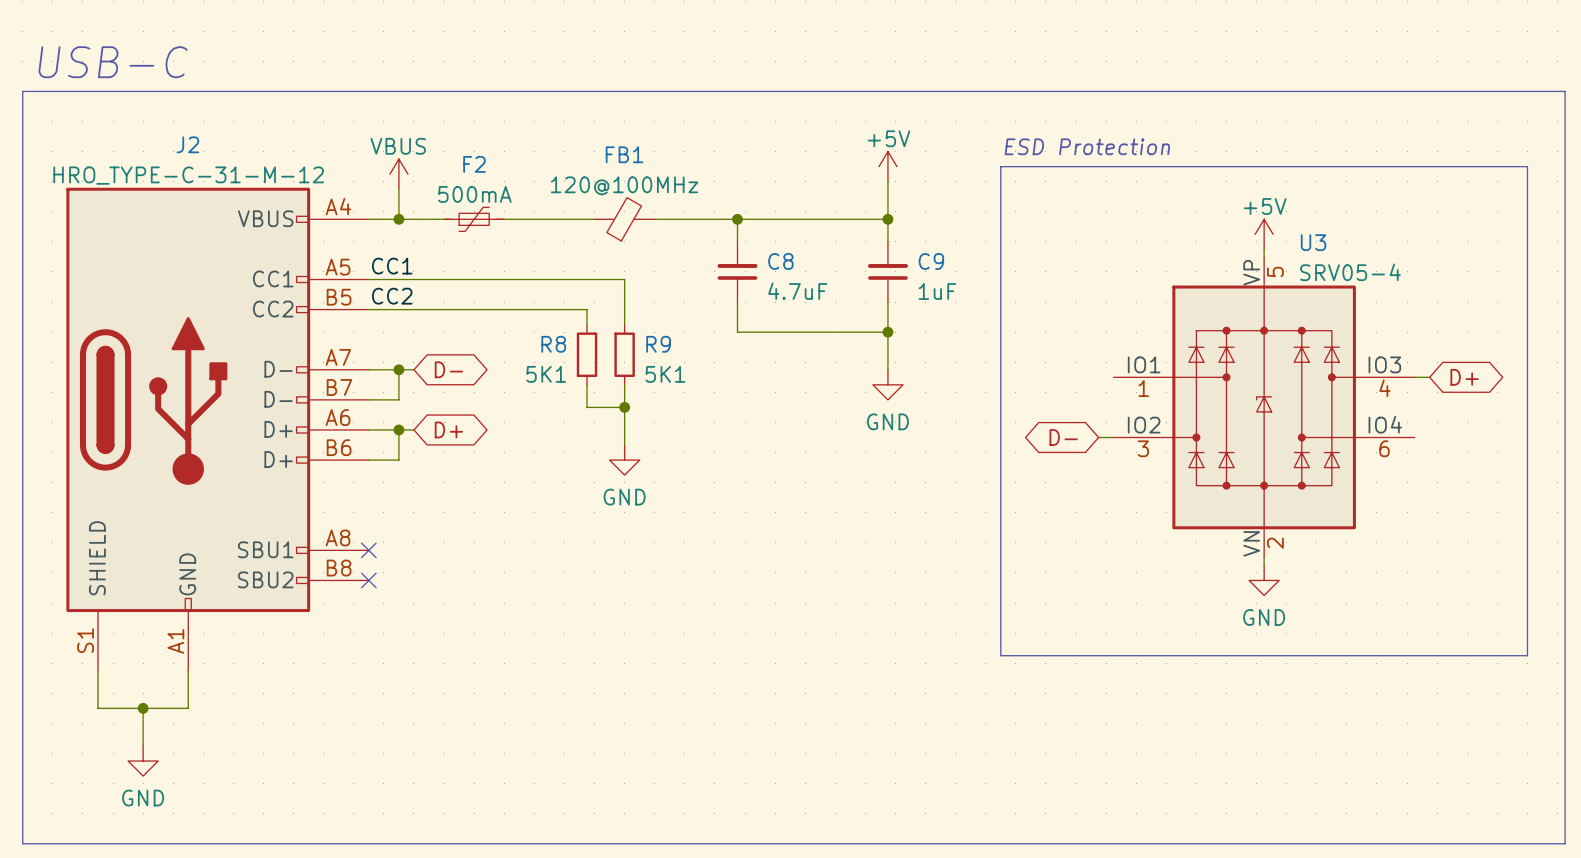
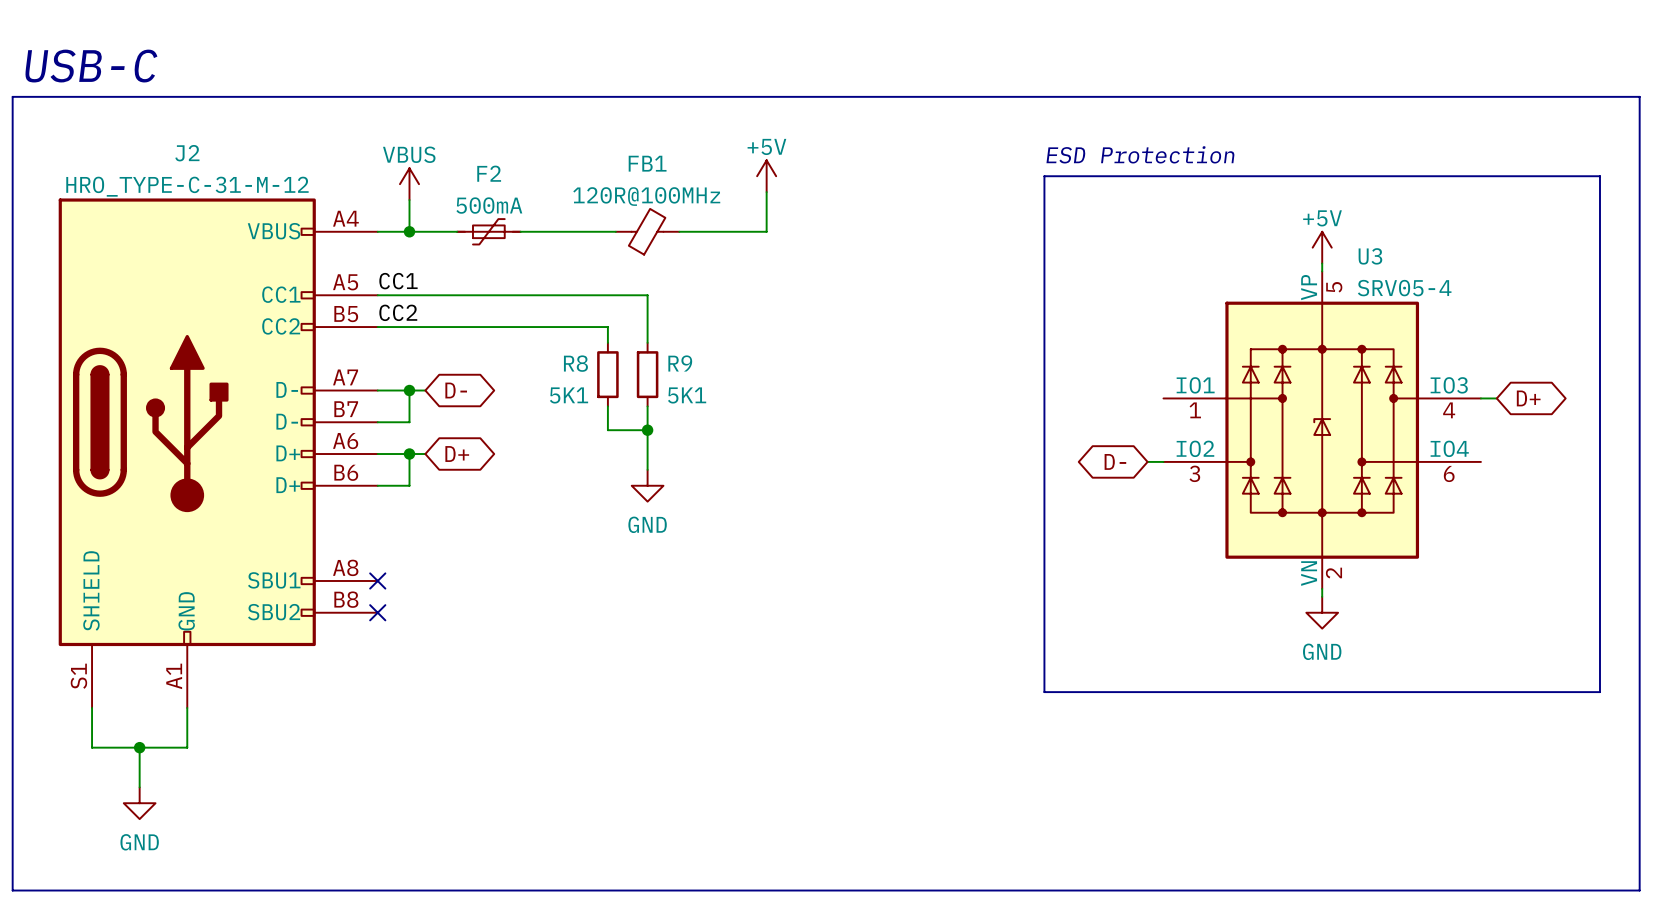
power symbol position: +5V (887, 166) -> +5V (766, 176)
wire: none -> (766, 192) (766, 231)
wire: (887, 181) (887, 241) -> none
FB1 value: 120@100MHz (624, 185) -> 120R@100MHz (646, 196)
junction: (737, 219) -> none
wire: (887, 219) (737, 219) (737, 241) -> none
junction: (887, 219) -> none
C8: 4.7uF (737, 271) -> none
C9: 1uF (887, 271) -> none
wire: (737, 302) (737, 332) (887, 332) -> none
wire: (887, 302) (887, 369) -> none
junction: (887, 332) -> none
power symbol: GND (887, 384) -> none

